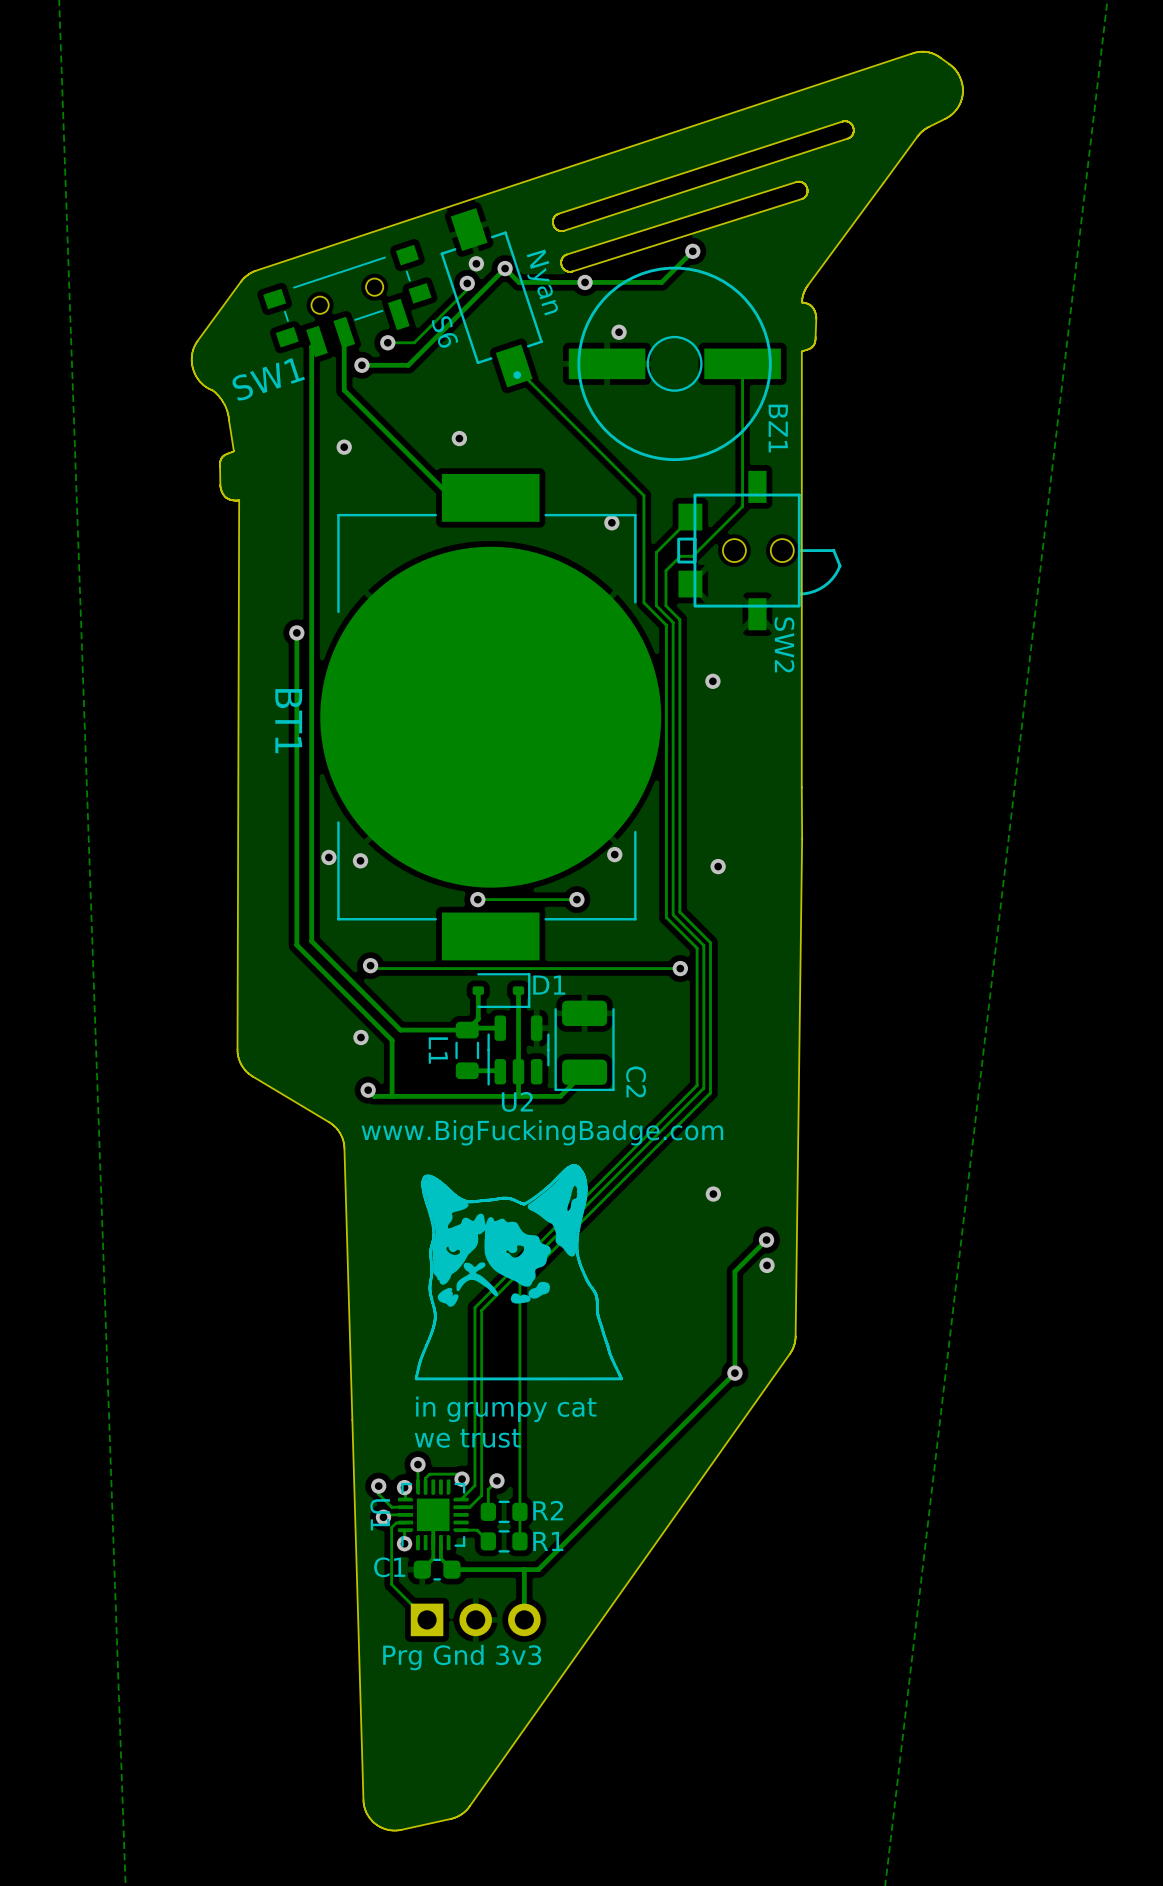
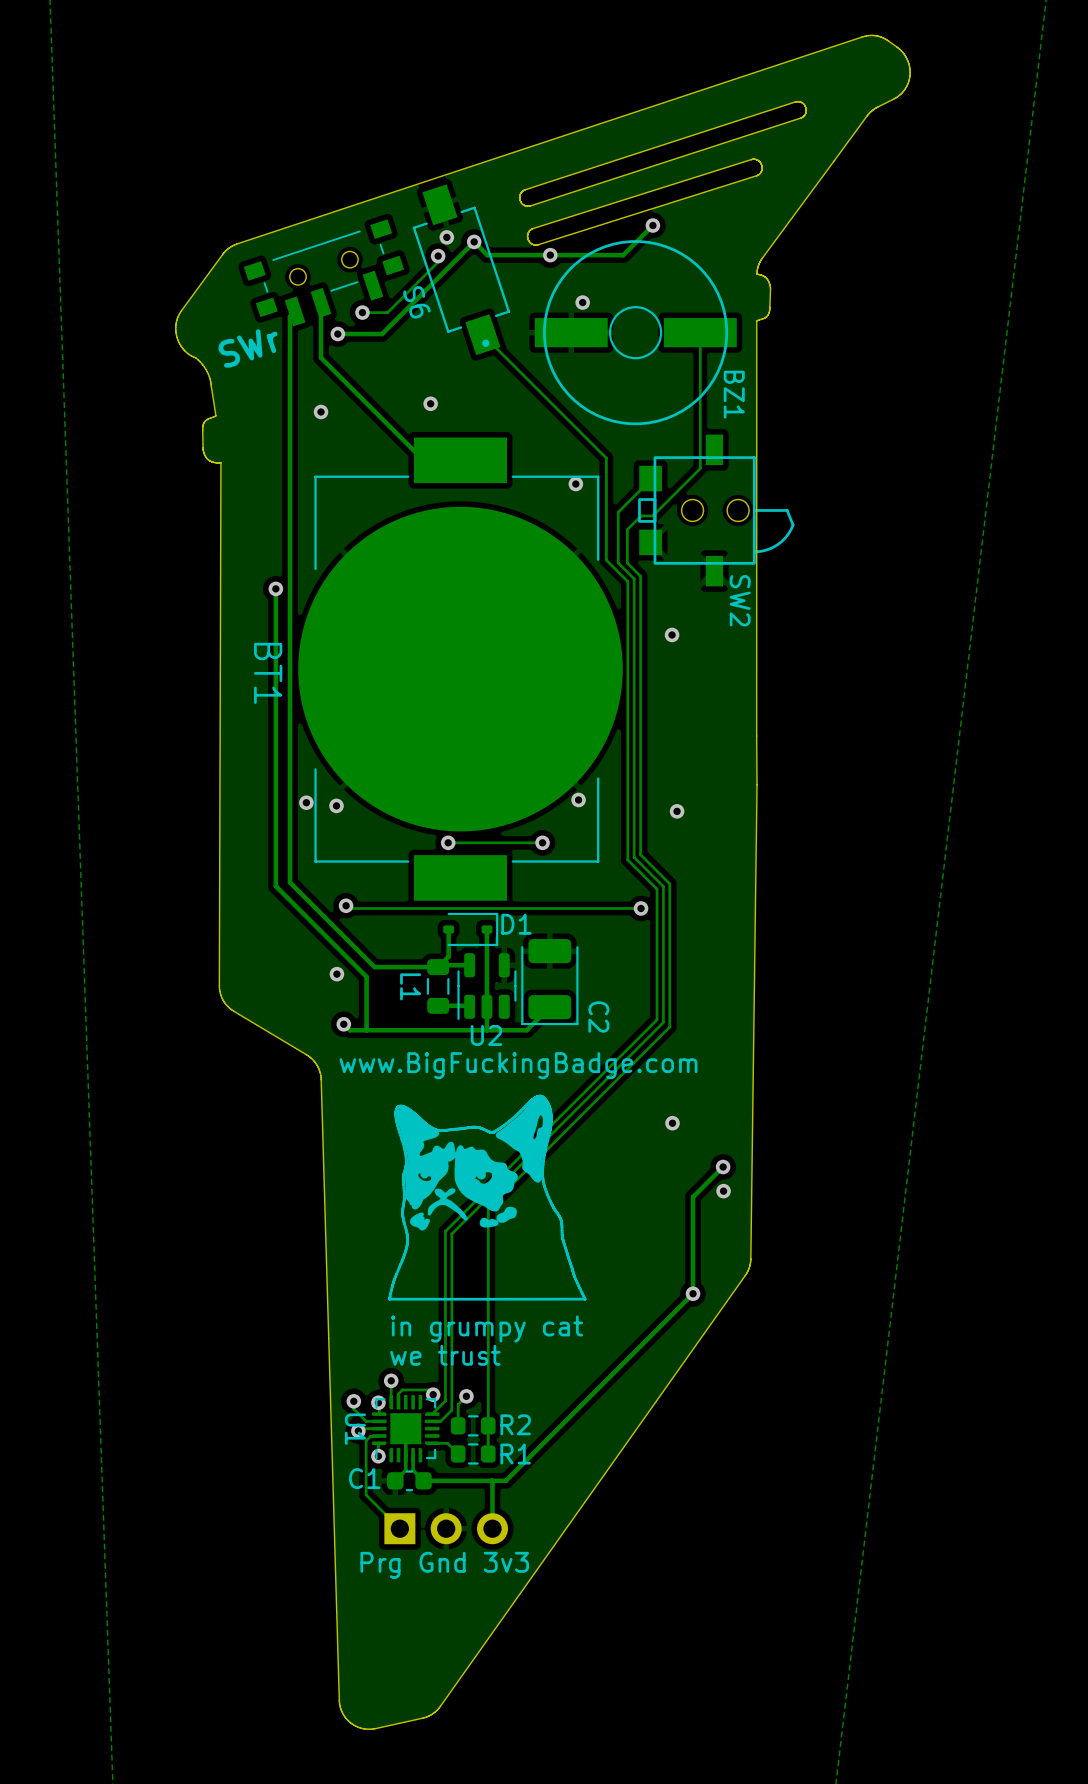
text: Nyan (542, 282) -> none
SW1 name: SW1 (268, 379) -> SWr (248, 348)

